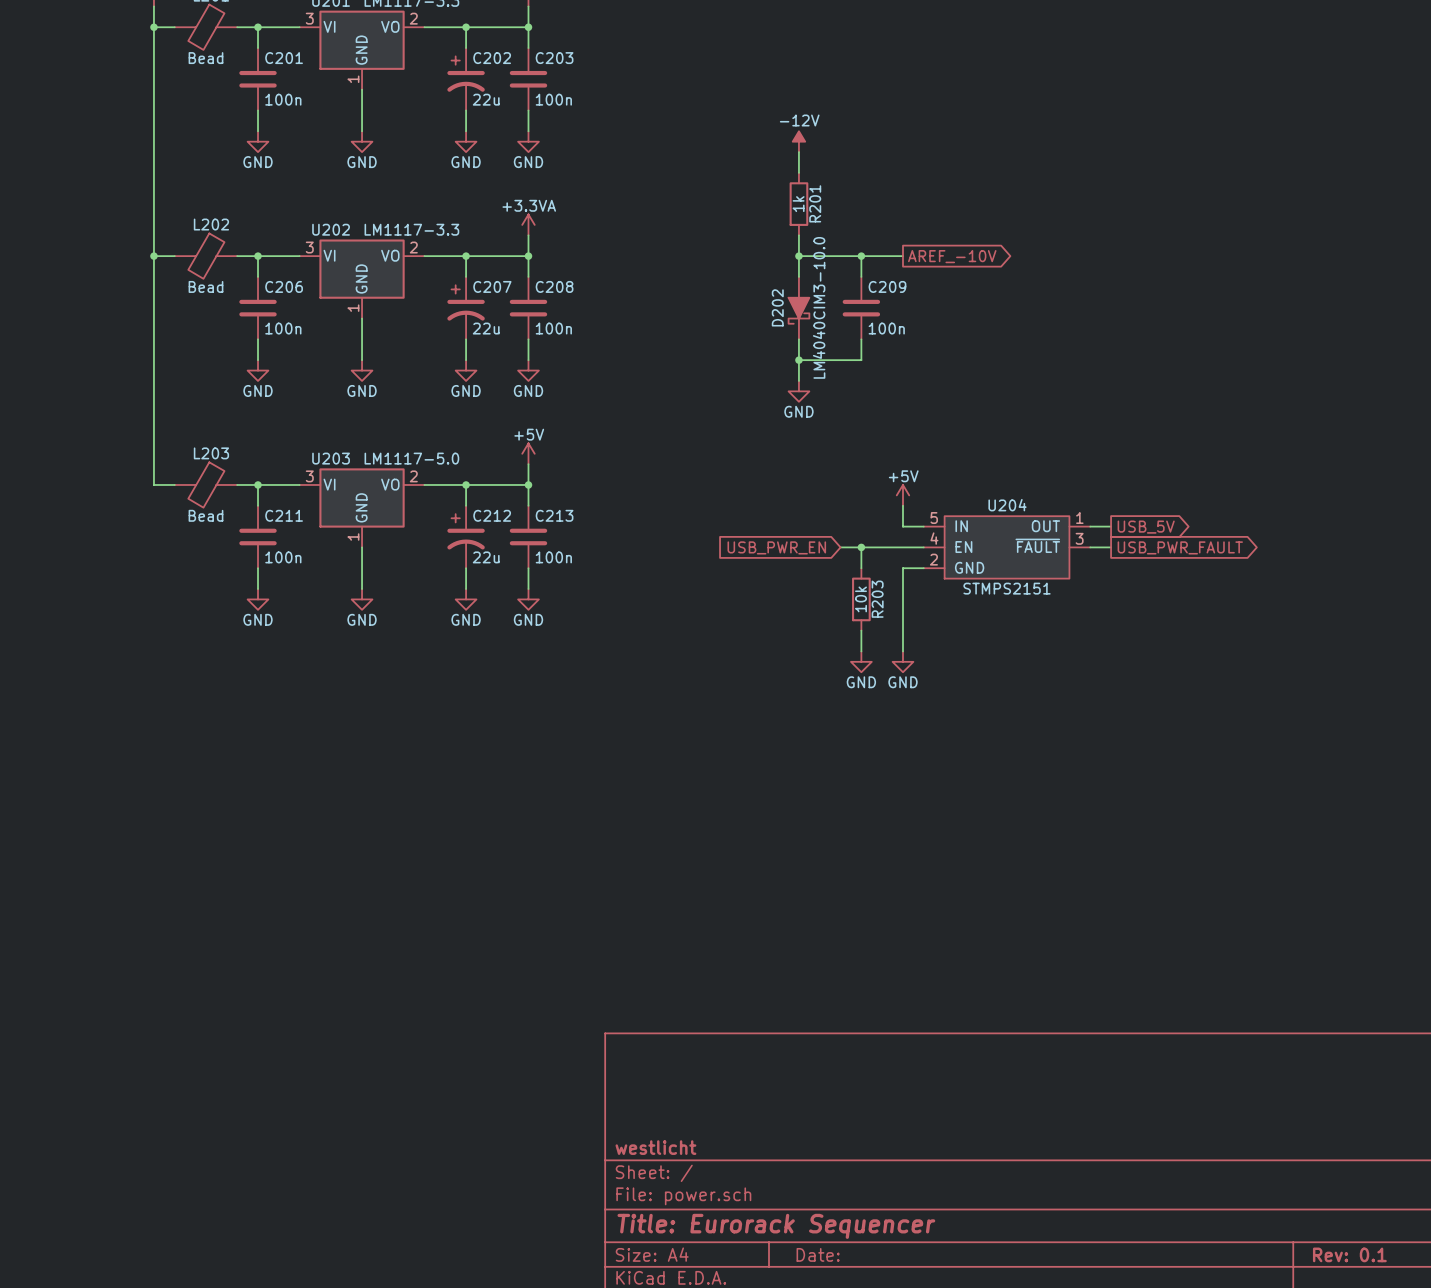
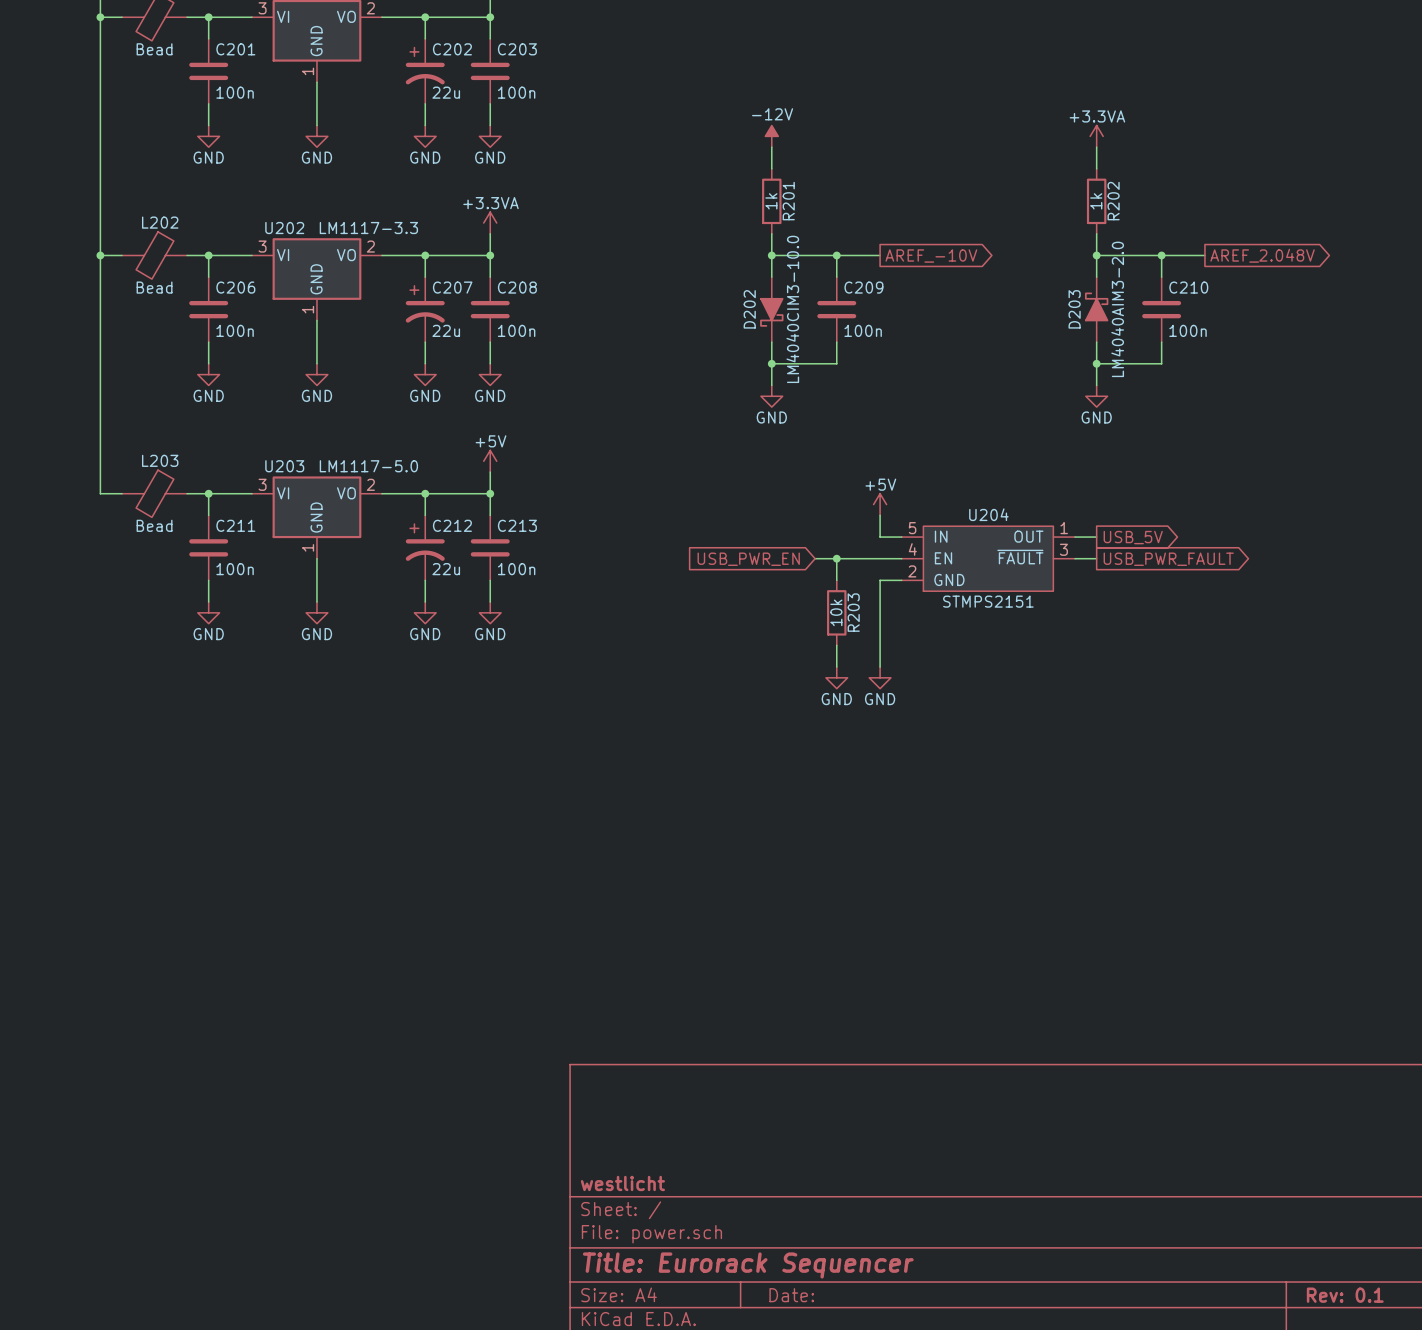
power symbol: none -> +3.3VA (1096, 136)
wire: none -> (1096, 147) (1096, 168)
R202: none -> 1k (1096, 201)
wire: none -> (1096, 233) (1096, 277)
wire: none -> (1096, 255) (1204, 255)
junction: none -> (1096, 255)
wire: none -> (1161, 255) (1161, 277)
junction: none -> (1161, 255)
global label: none -> AREF_2.048V (1262, 255)
D203: none -> LM4040AIM3-2.0 (1096, 309)
C210: none -> 100n (1161, 309)
wire: none -> (1096, 342) (1096, 385)
wire: none -> (1161, 342) (1161, 363) (1096, 363)
junction: none -> (1096, 363)
power symbol: none -> GND (1096, 396)

